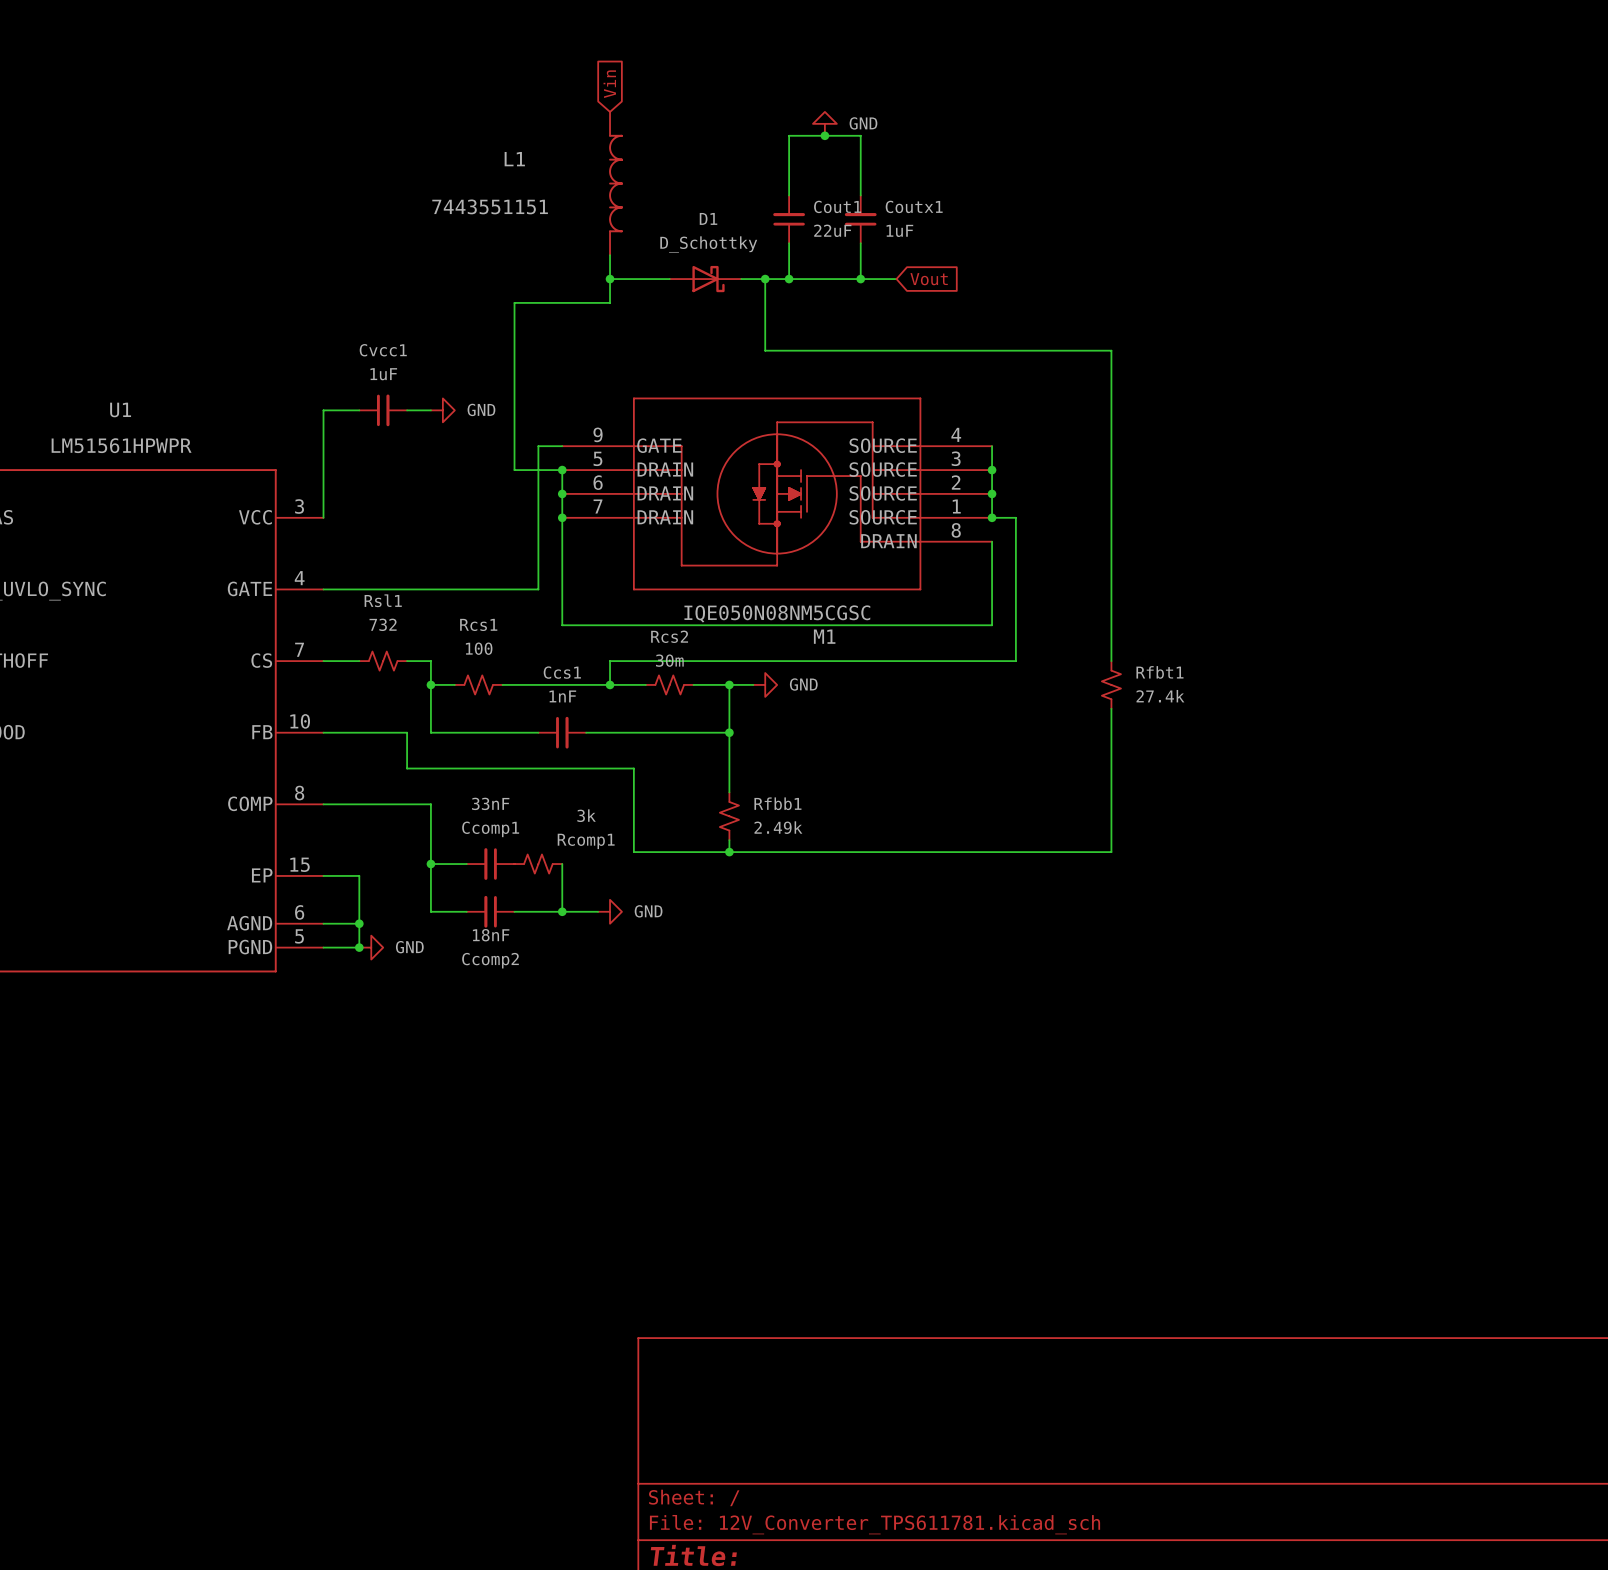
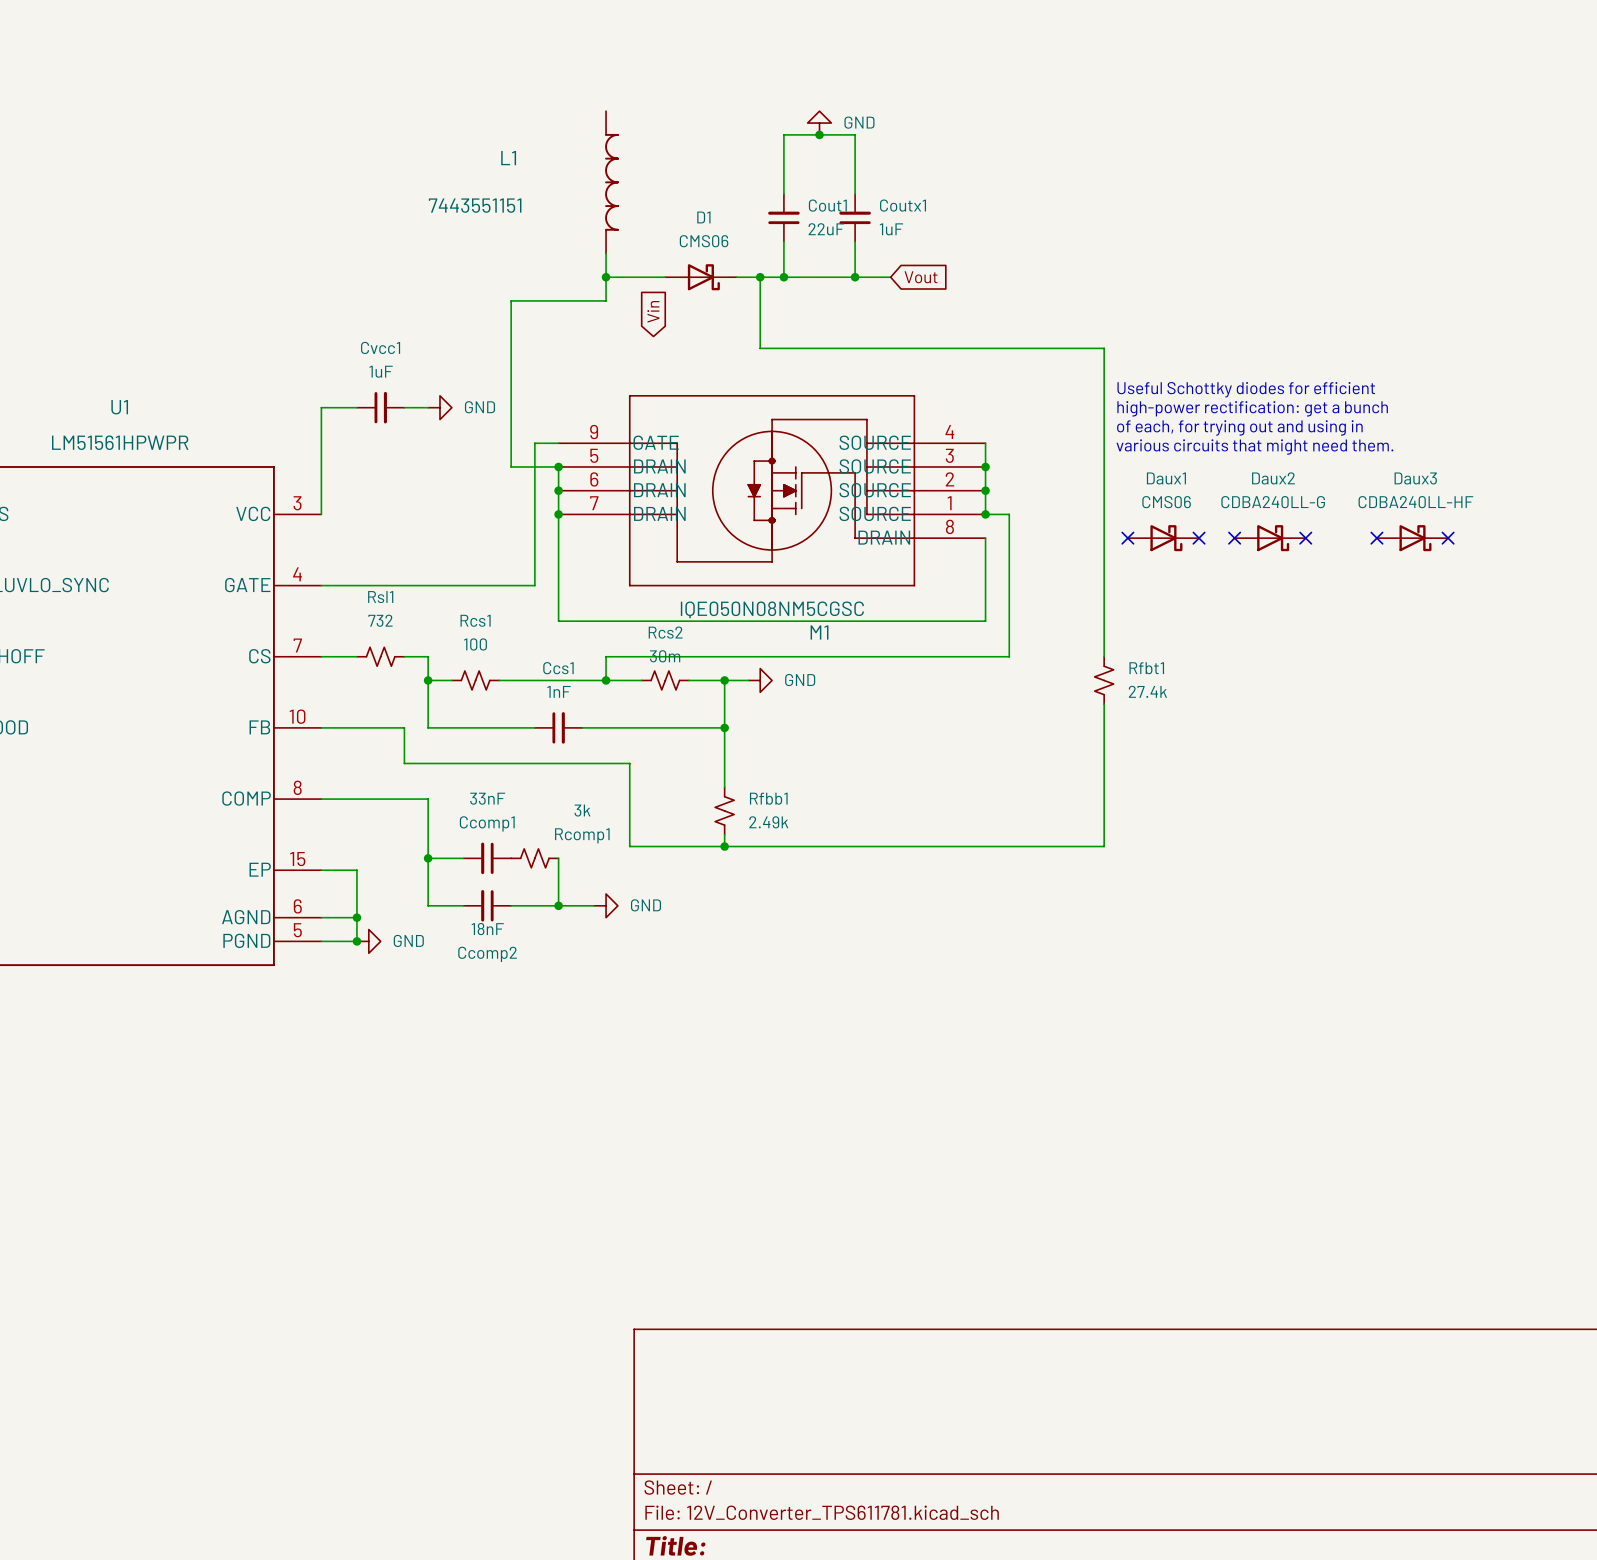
global label position: Vin (609, 84) -> Vin (653, 311)
D1 value: D_Schottky (708, 244) -> CMS06 (704, 241)
text: none -> Useful Schottky diodes for efficient (1246, 389)
text: none -> high-power rectification: get a bunch (1252, 408)
text: none -> of each, for trying out and using in (1239, 427)
text: none -> various circuits that might need them. (1254, 447)
no-connect mark: none -> (1127, 538)
Daux1: none -> CMS06 (1163, 538)
no-connect mark: none -> (1199, 538)
no-connect mark: none -> (1234, 538)
Daux2: none -> CDBA240LL-G (1270, 538)
no-connect mark: none -> (1305, 538)
no-connect mark: none -> (1376, 538)
Daux3: none -> CDBA240LL-HF (1412, 538)
no-connect mark: none -> (1448, 538)

